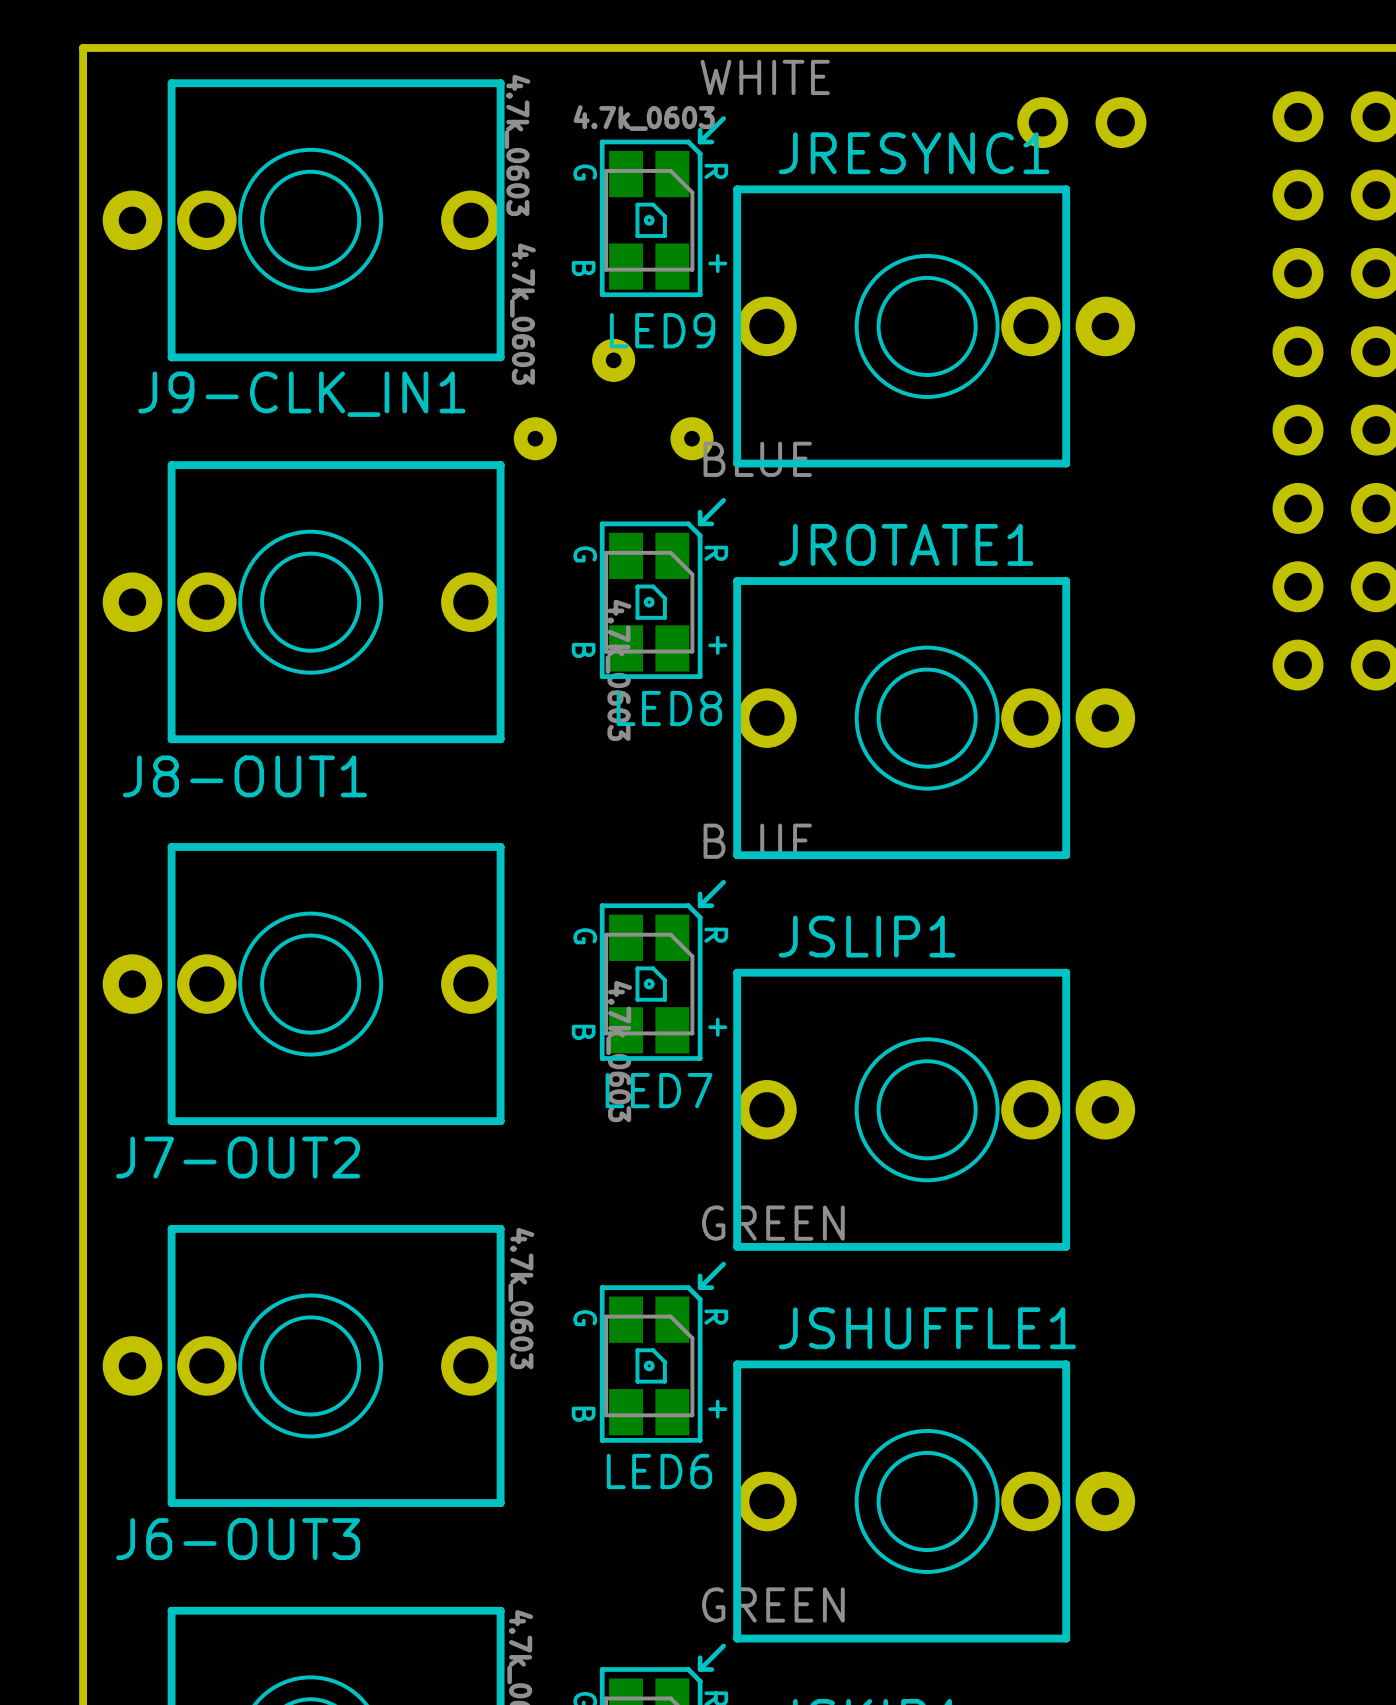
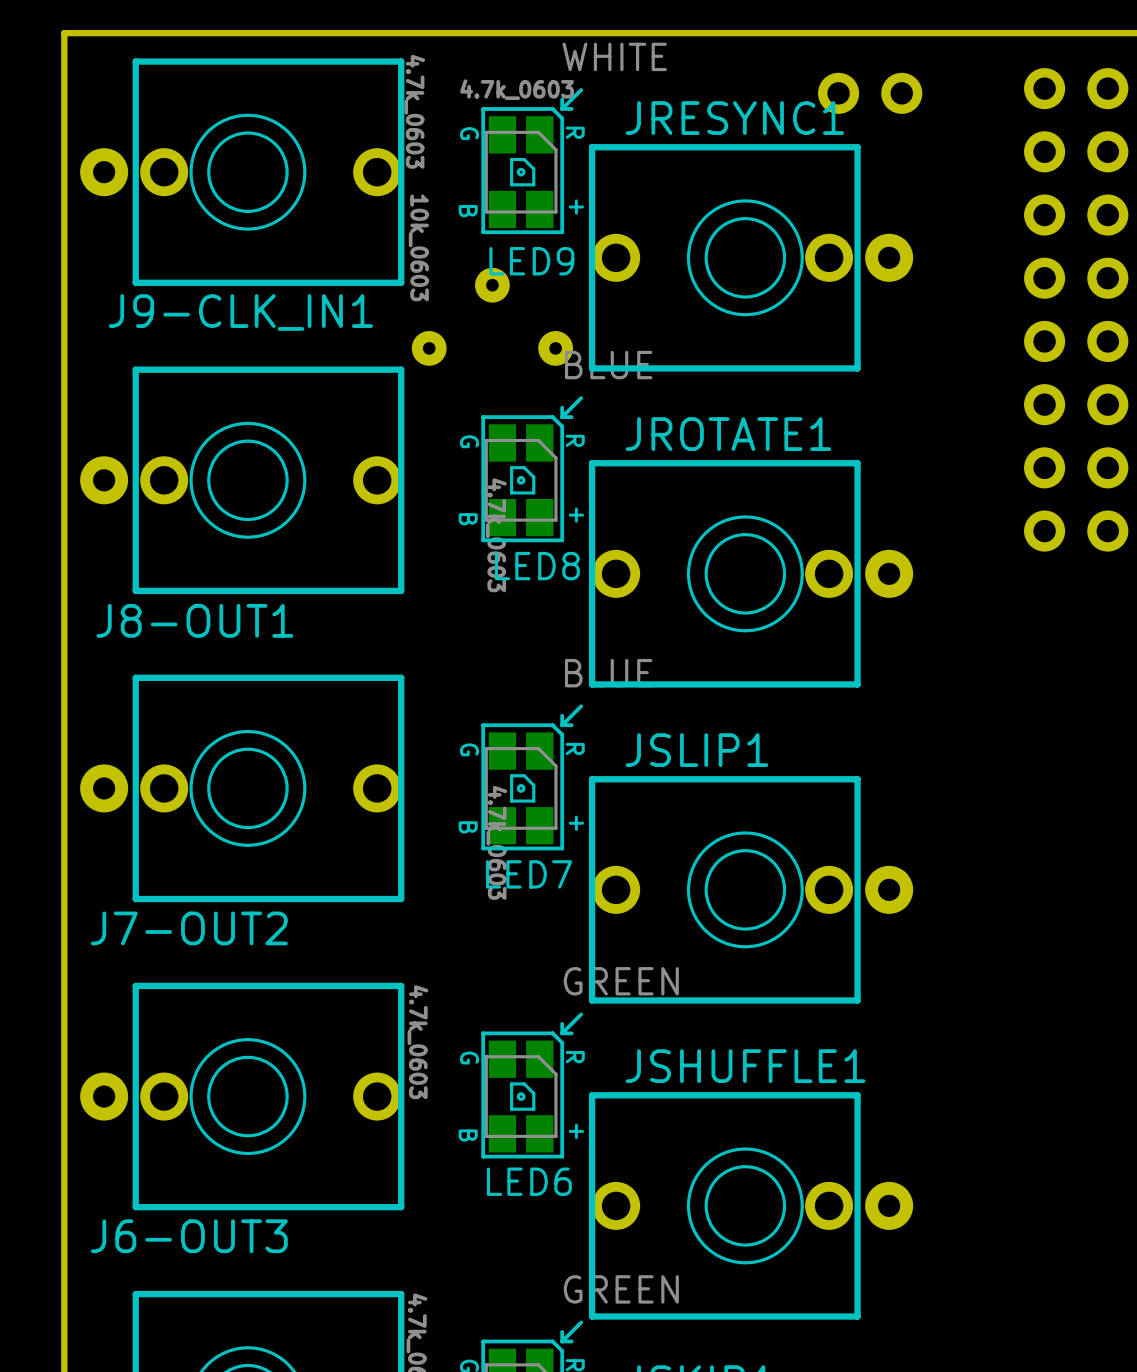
part value: 4.7k_0603 (522, 314) -> 10k_0603 (418, 247)

